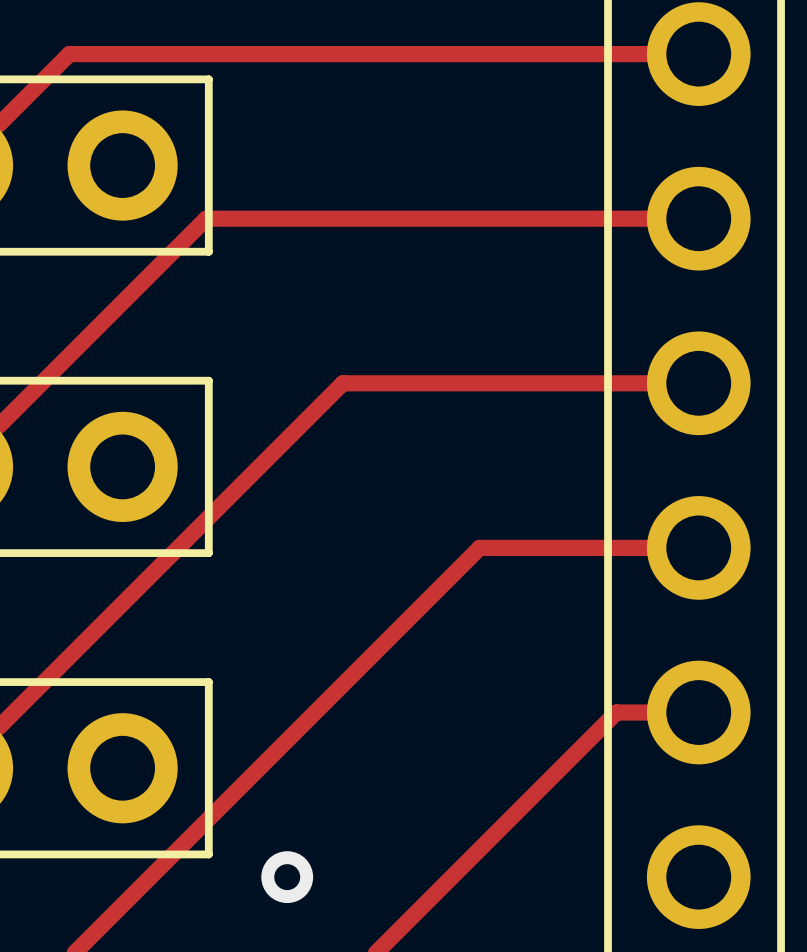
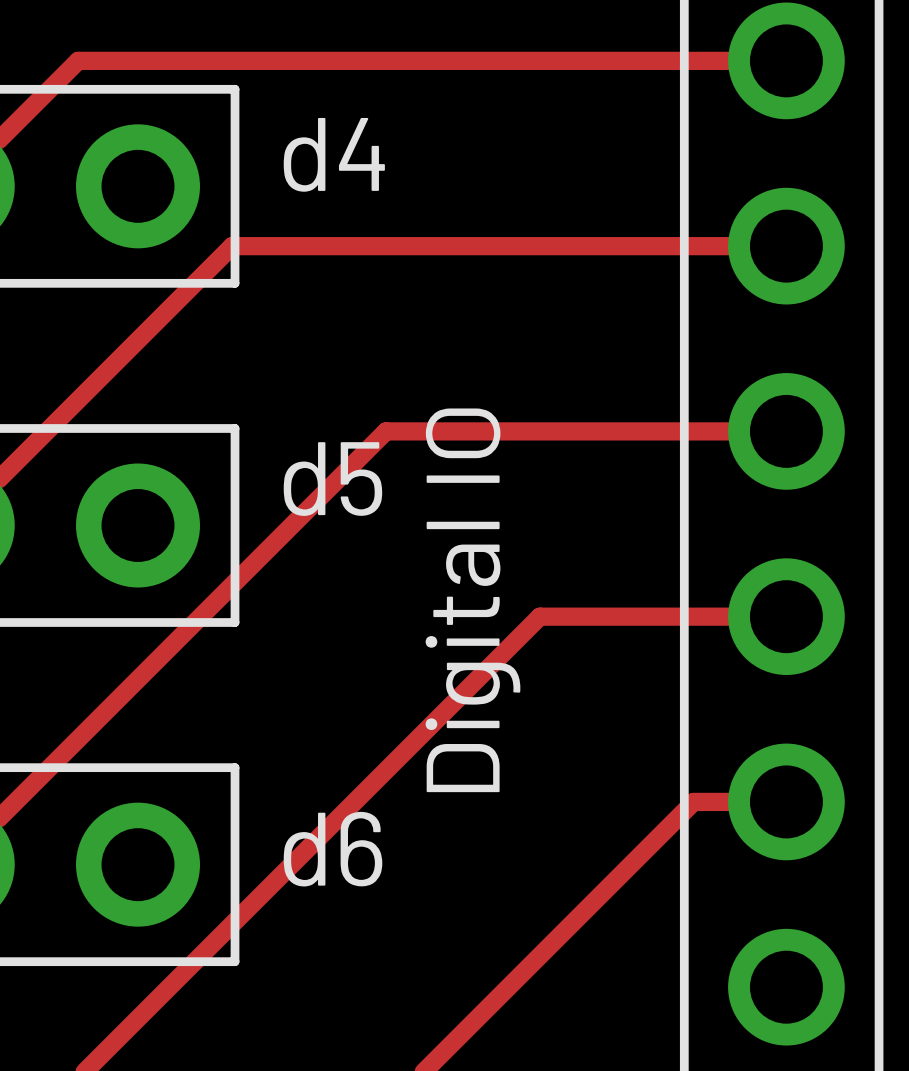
text: none -> d4 (334, 154)
text: none -> d5 (332, 479)
text: none -> Digital IO (472, 600)
text: none -> d6 (333, 849)
via: (287, 877) -> none

